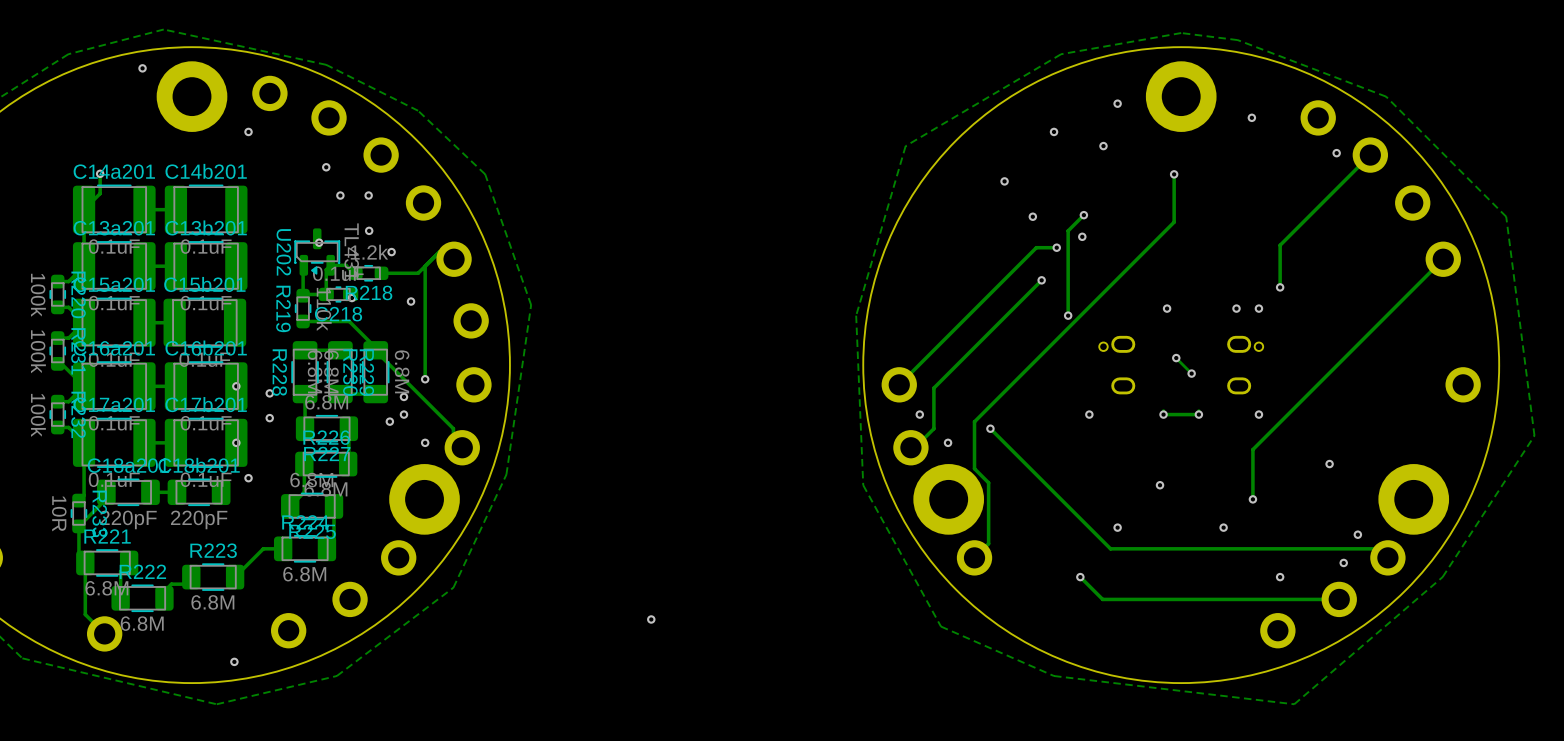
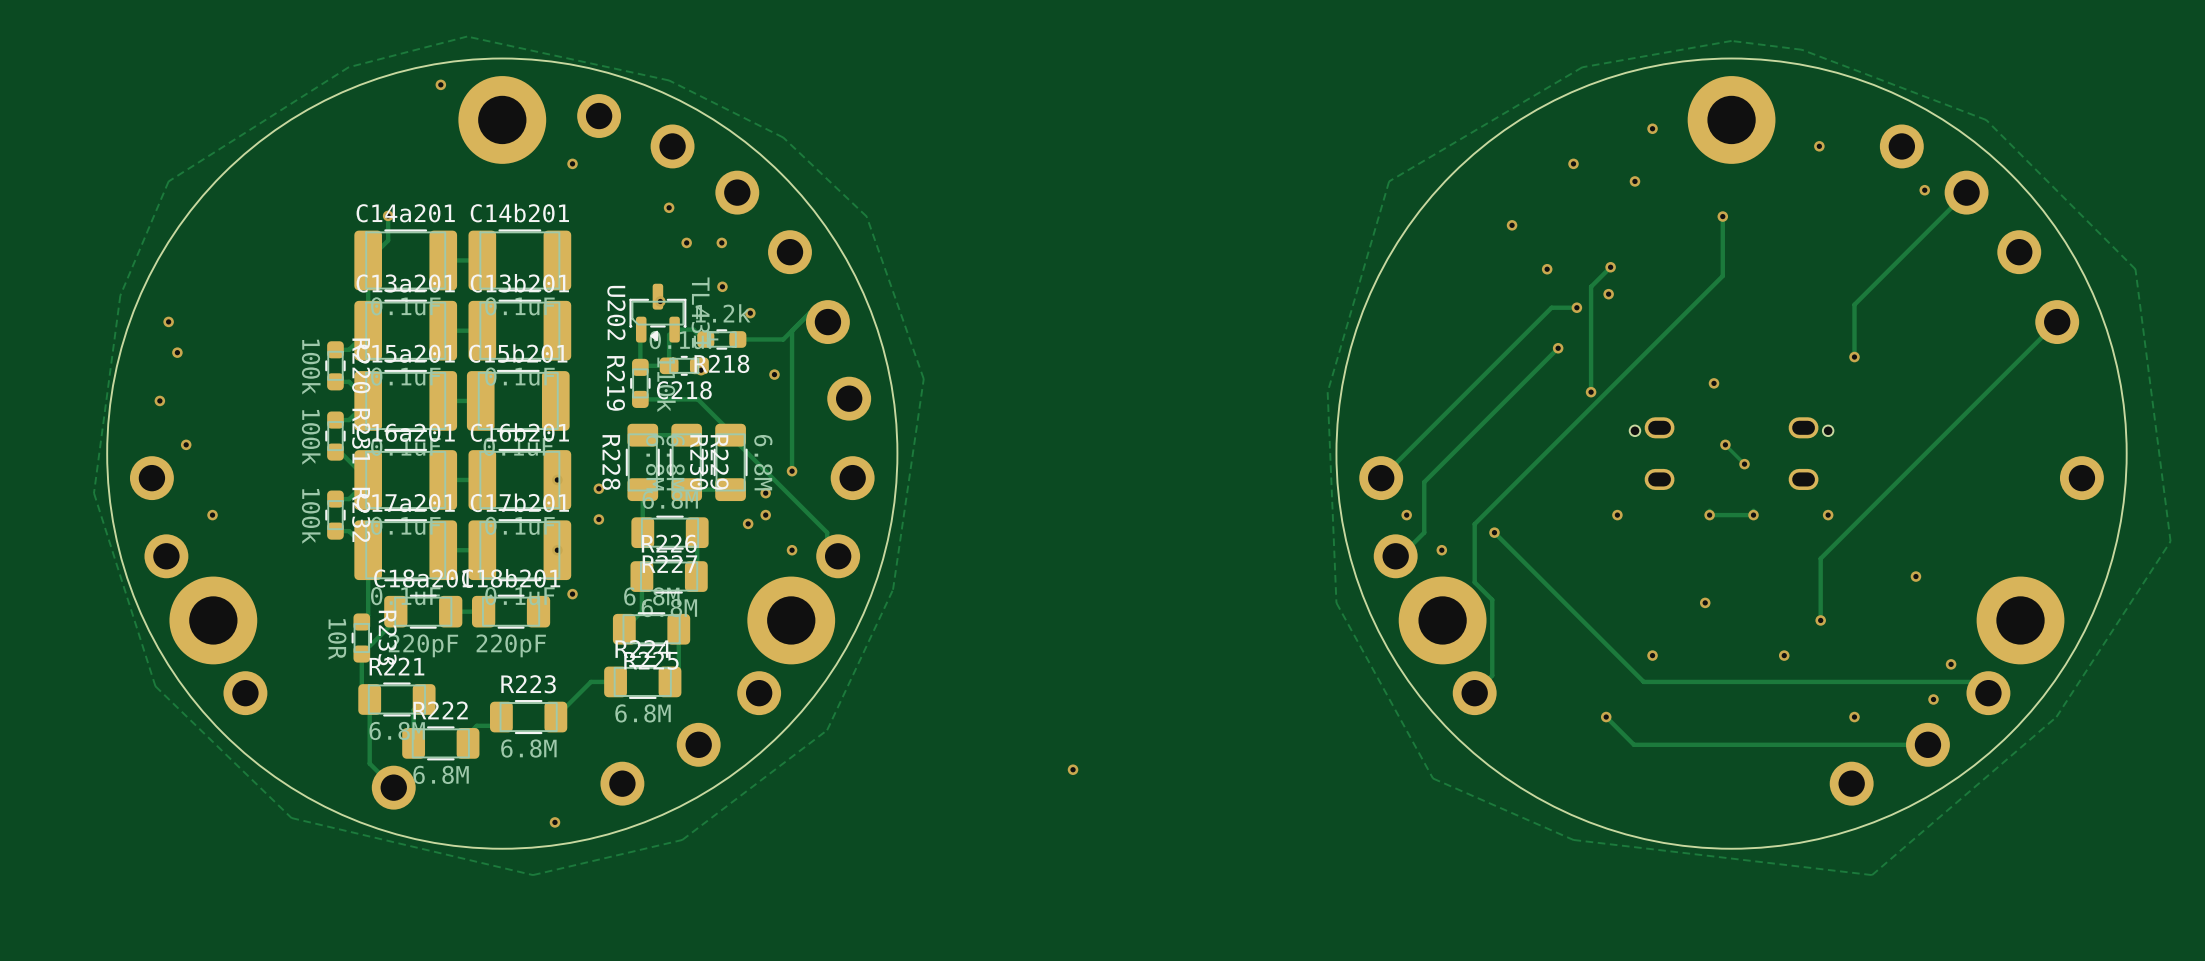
via: (1236, 308) -> none
via: (1258, 308) -> none

